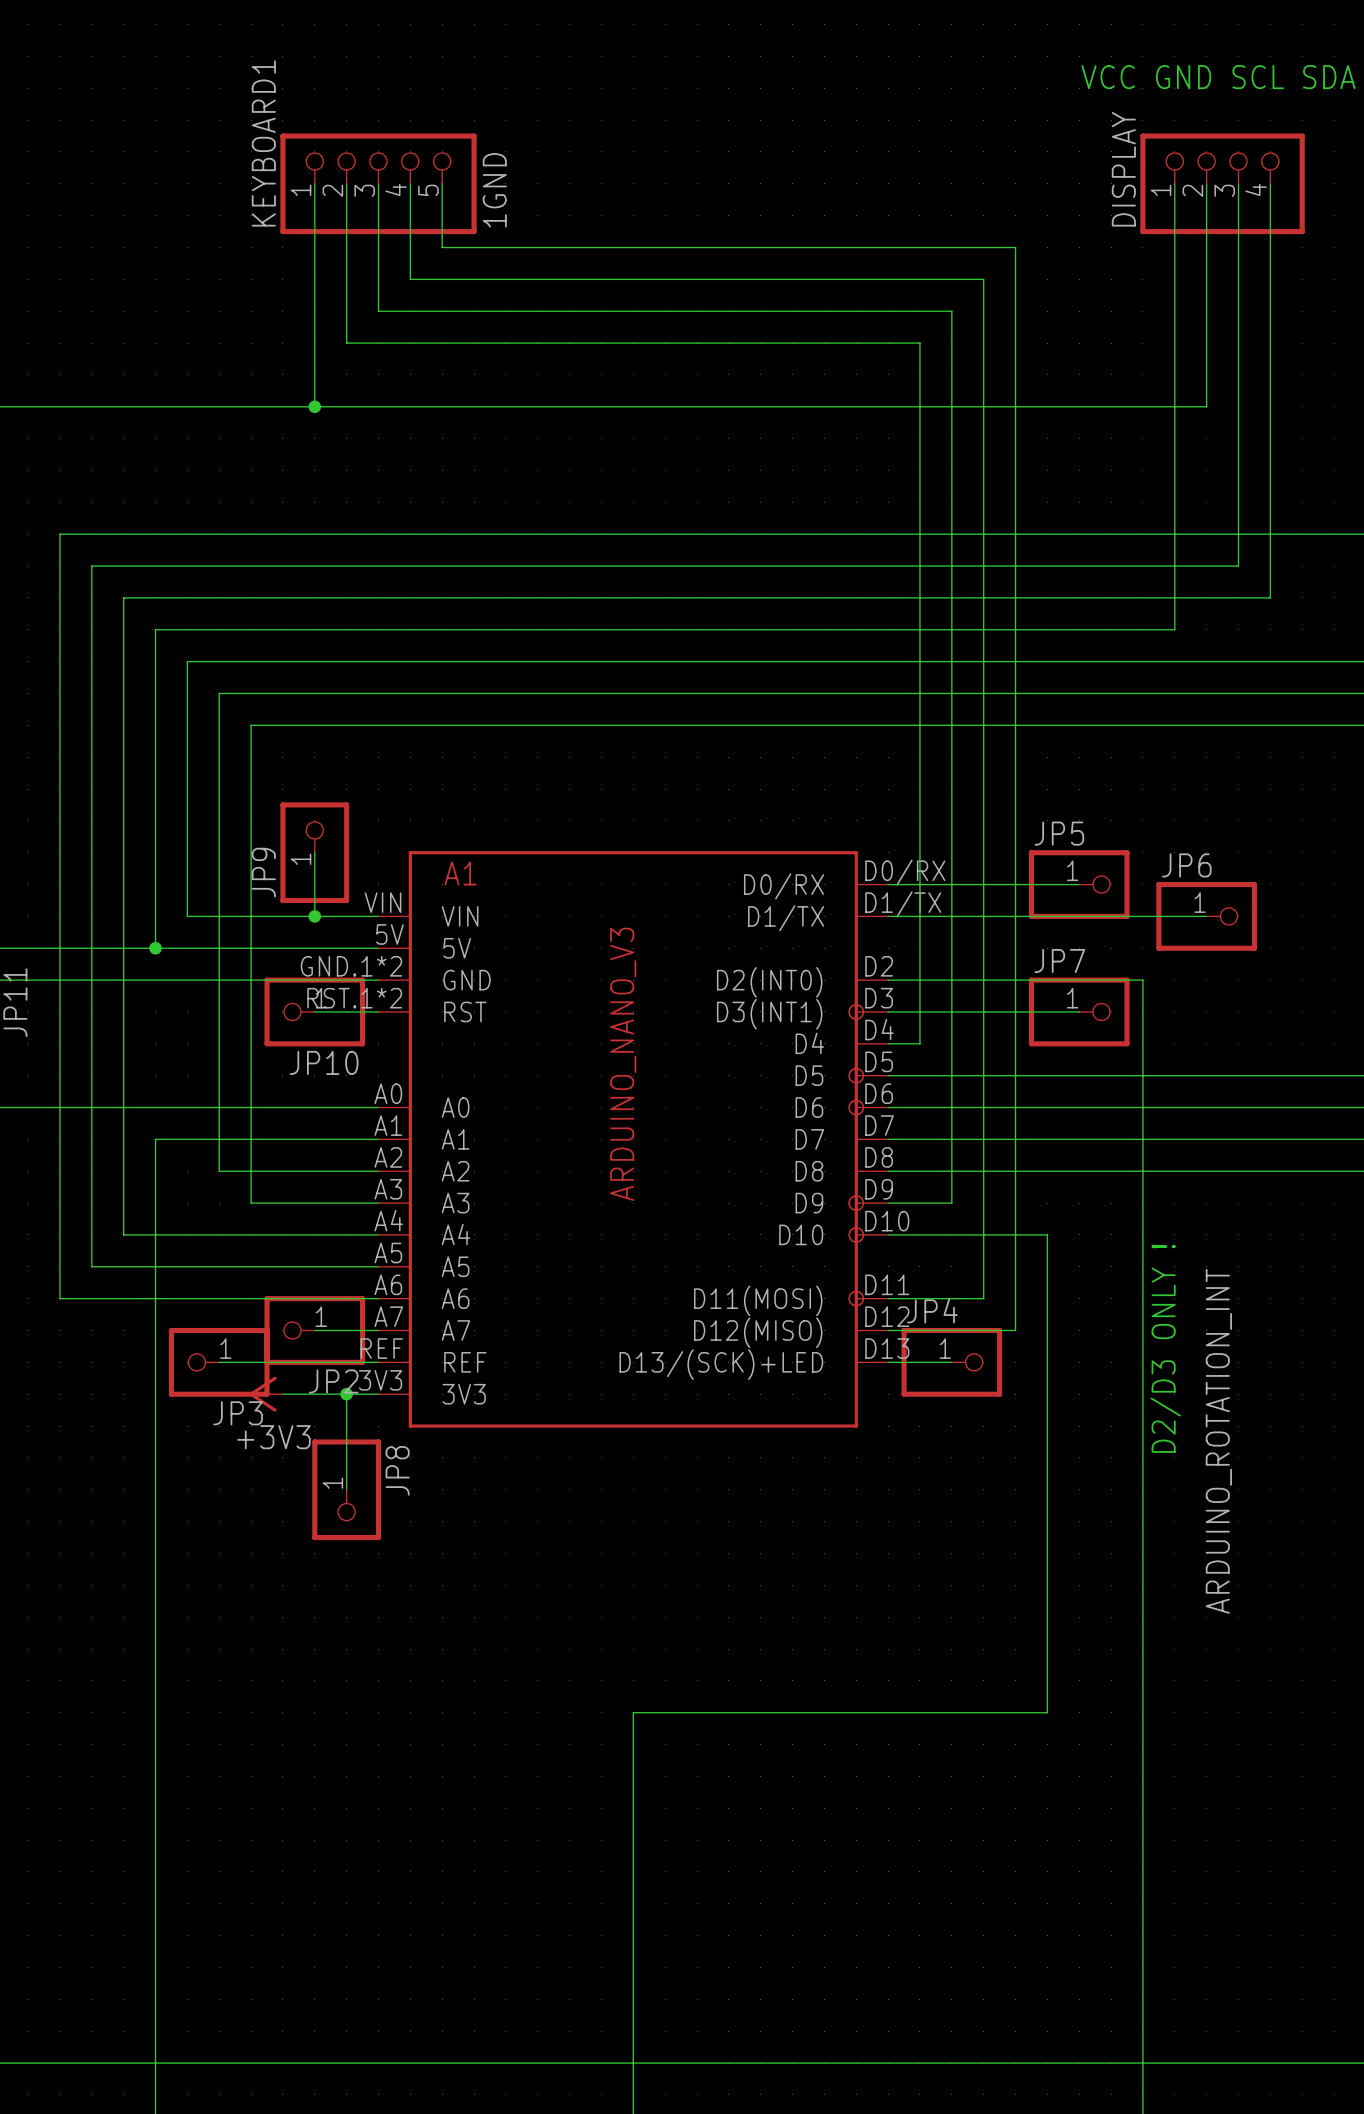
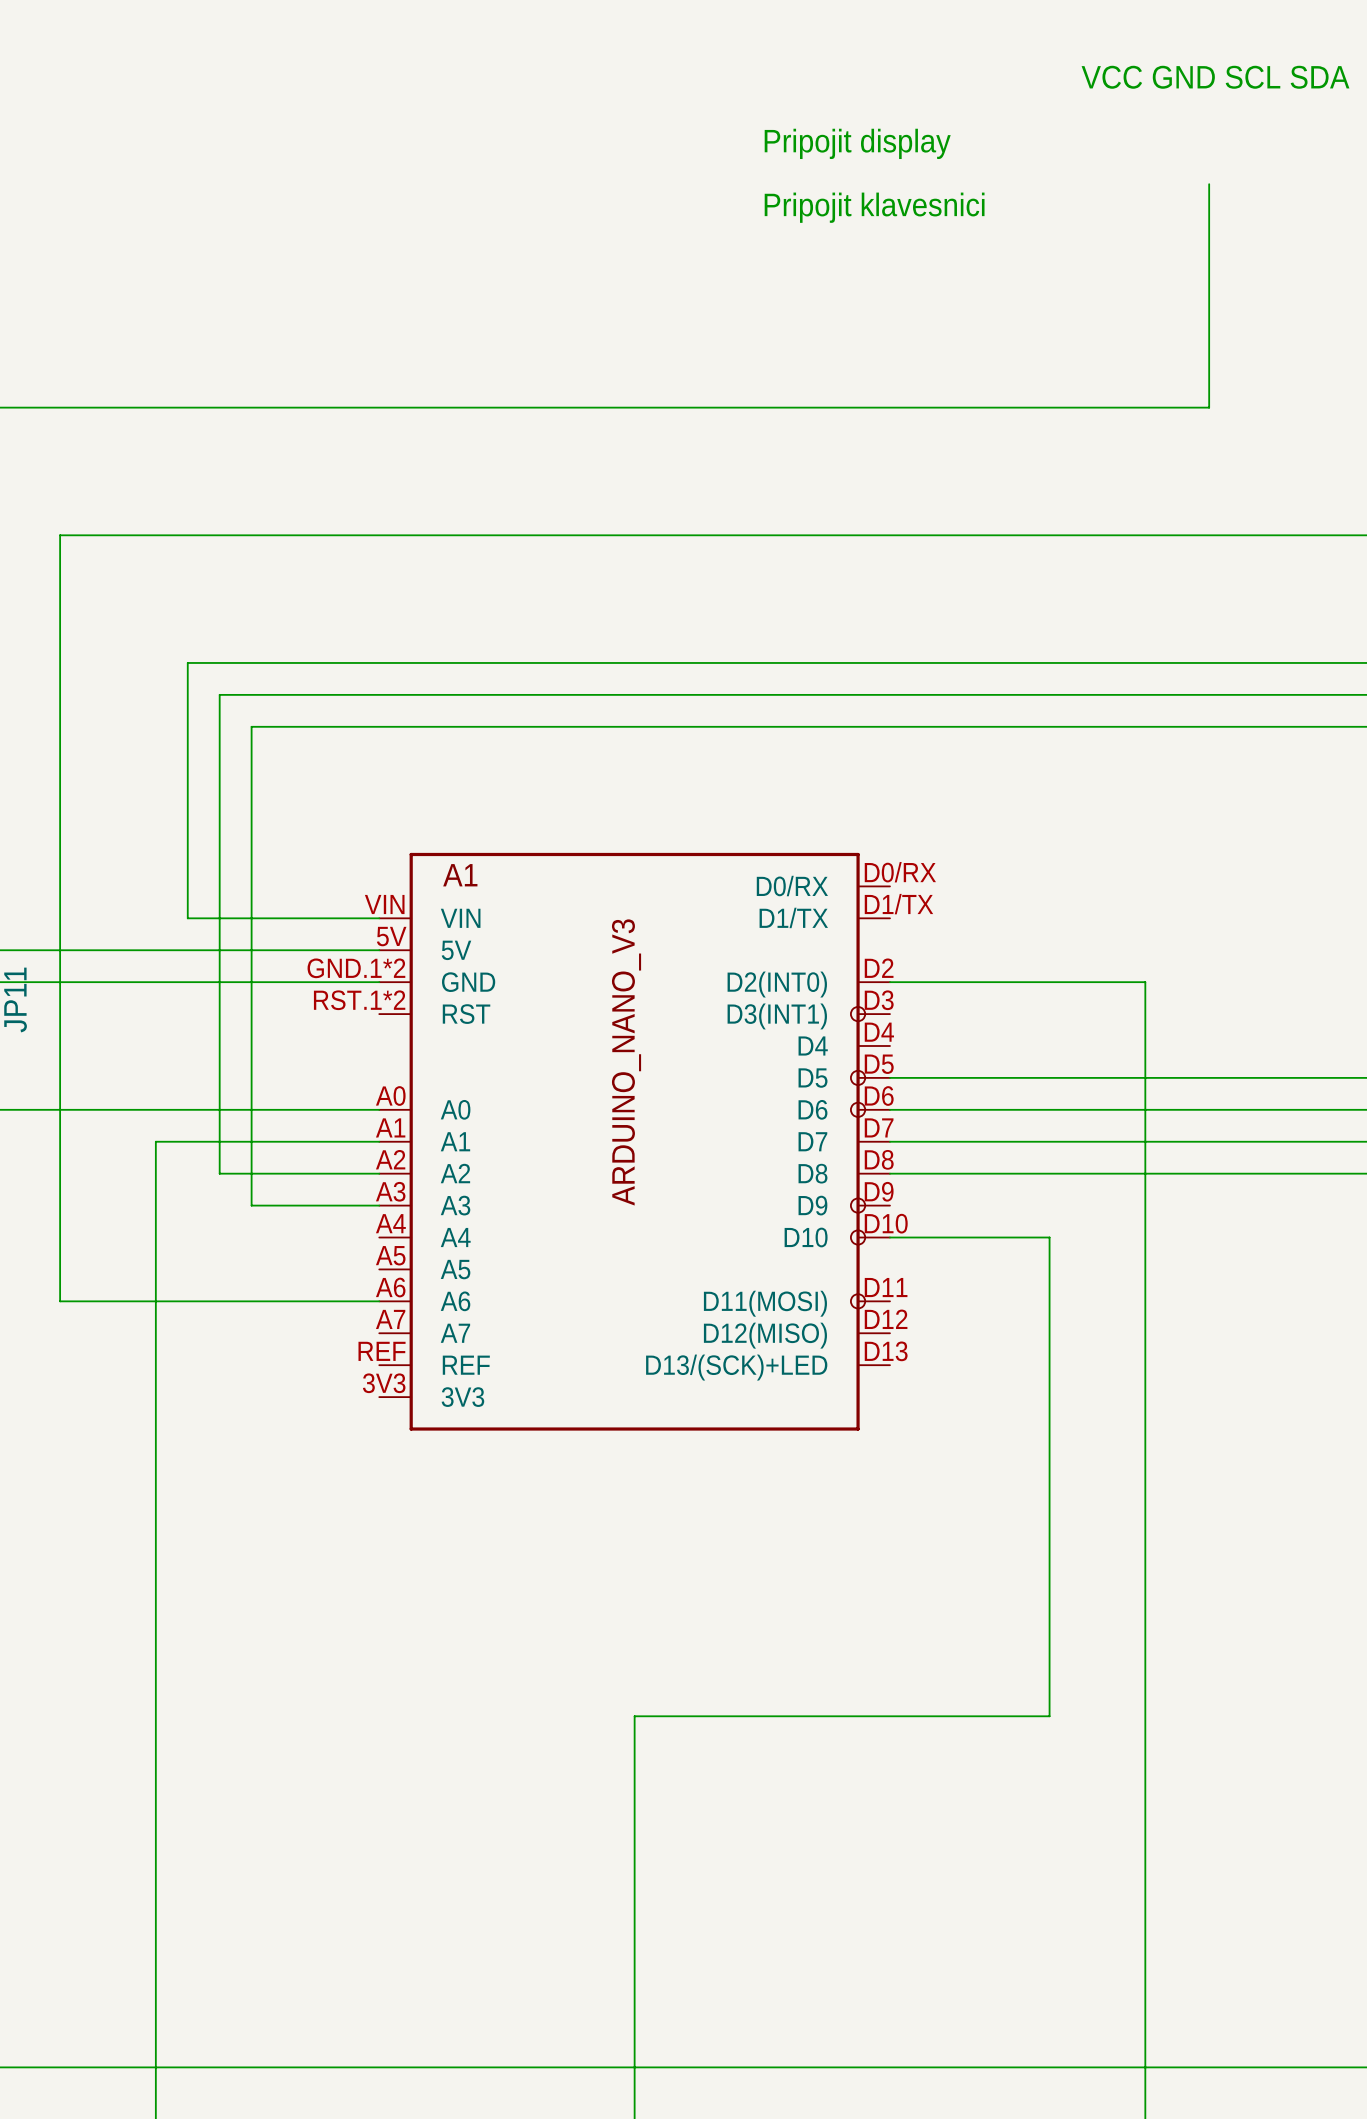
text: none -> Pripojit display (857, 143)
wire: (314, 183) (314, 406) -> none
wire: (346, 183) (346, 343) (919, 343) (919, 1043) (888, 1043) -> none
wire: (378, 183) (378, 311) (951, 311) (951, 1203) (888, 1203) -> none
KEYBOARD1: 1GND (378, 183) -> none
wire: (410, 183) (410, 279) (983, 279) (983, 1298) (888, 1298) -> none
wire: (442, 183) (442, 247) (1015, 247) (1015, 1330) (888, 1330) -> none
wire: (1174, 183) (1174, 629) (155, 629) (155, 948) -> none
DISPLAY: (1222, 183) -> none
wire: (1238, 183) (1238, 566) (91, 566) (91, 1266) (378, 1266) -> none
wire: (1270, 183) (1270, 597) (123, 597) (123, 1234) (378, 1234) -> none
text: none -> Pripojit klavesnici (874, 207)
junction: (314, 406) -> none
wire: (314, 852) (314, 916) -> none
JP9: (314, 852) -> none
wire: (888, 884) (1079, 884) -> none
JP5: (1079, 884) -> none
junction: (314, 916) -> none
wire: (888, 916) (1206, 916) -> none
JP6: (1206, 916) -> none
junction: (155, 948) -> none
wire: (314, 1011) (378, 1011) -> none
JP10: (314, 1011) -> none
wire: (888, 1011) (1079, 1011) -> none
JP7: (1079, 1011) -> none
wire: (314, 1330) (378, 1330) -> none
JP2: (314, 1330) -> none
text: D2/D3 ONLY ! (1165, 1348) -> none
wire: (219, 1362) (378, 1362) -> none
JP3: (219, 1362) -> none
wire: (888, 1362) (951, 1362) -> none
JP4: (951, 1362) -> none
power symbol: +3V3 (266, 1394) -> none
wire: (282, 1394) (378, 1394) -> none
wire: (346, 1394) (346, 1489) -> none
junction: (346, 1394) -> none
label: ARDUINO_ROTATION_INT (1218, 1441) -> none
JP8: (346, 1489) -> none

